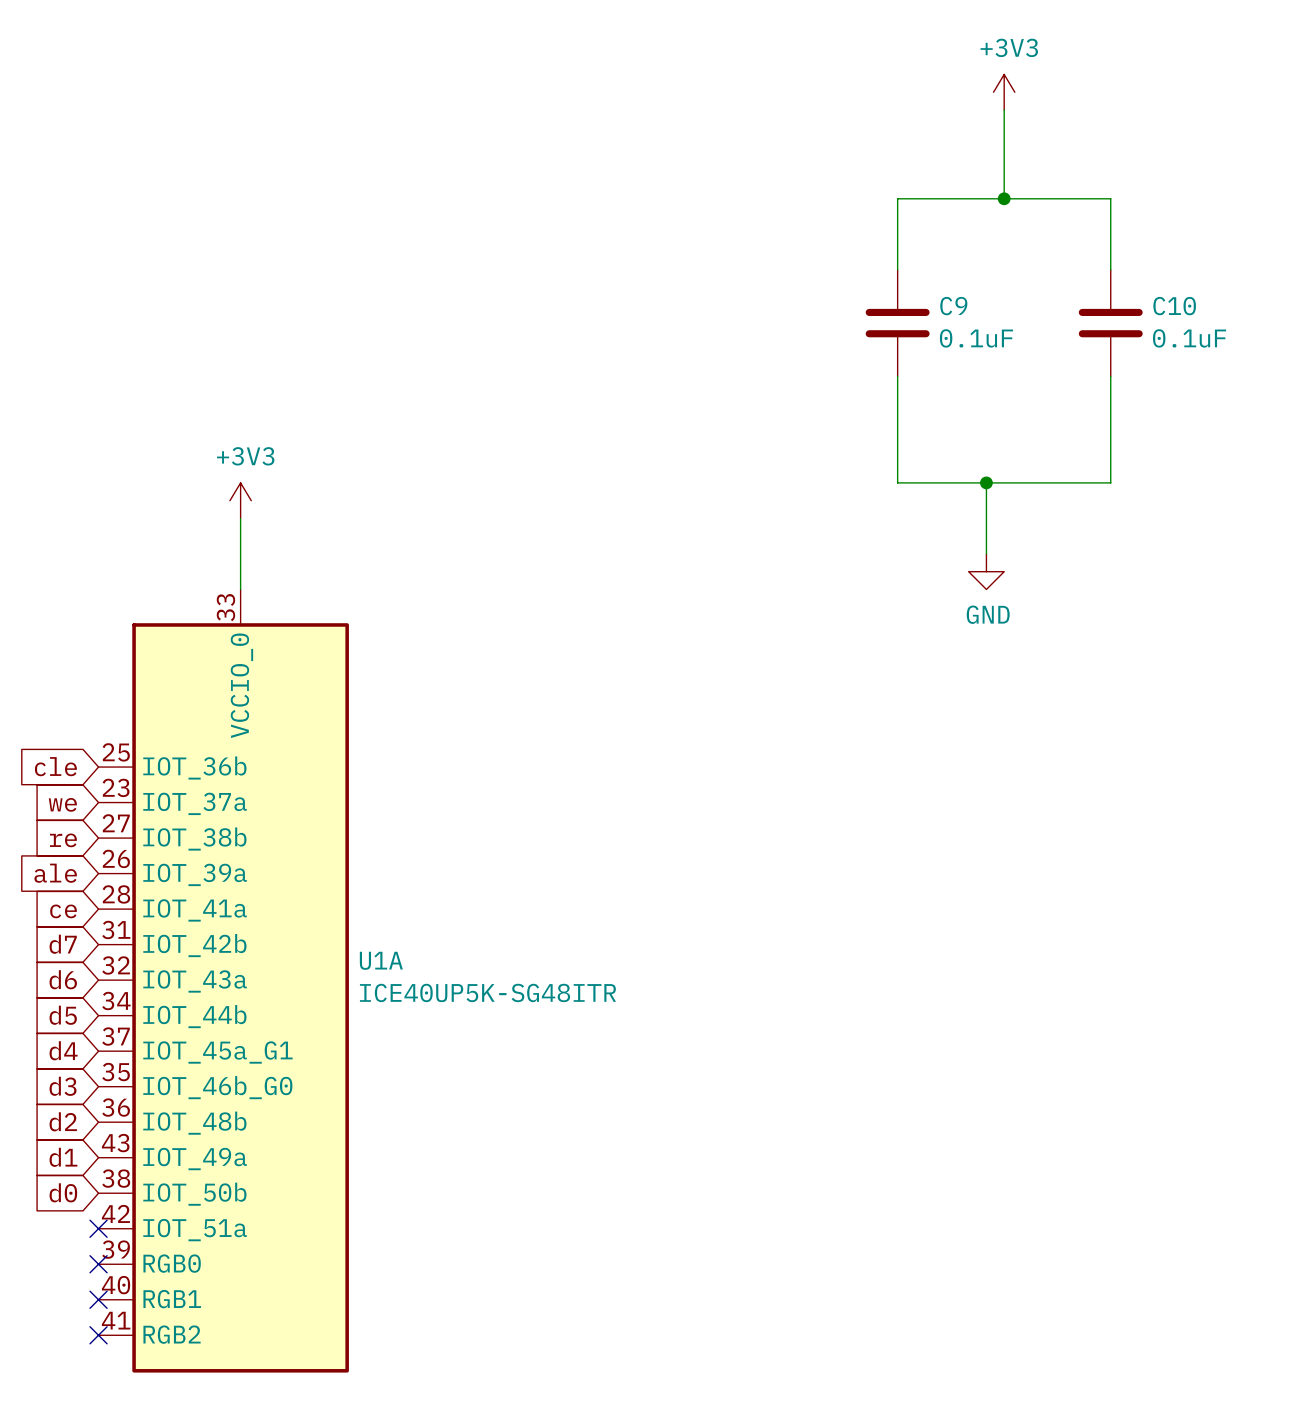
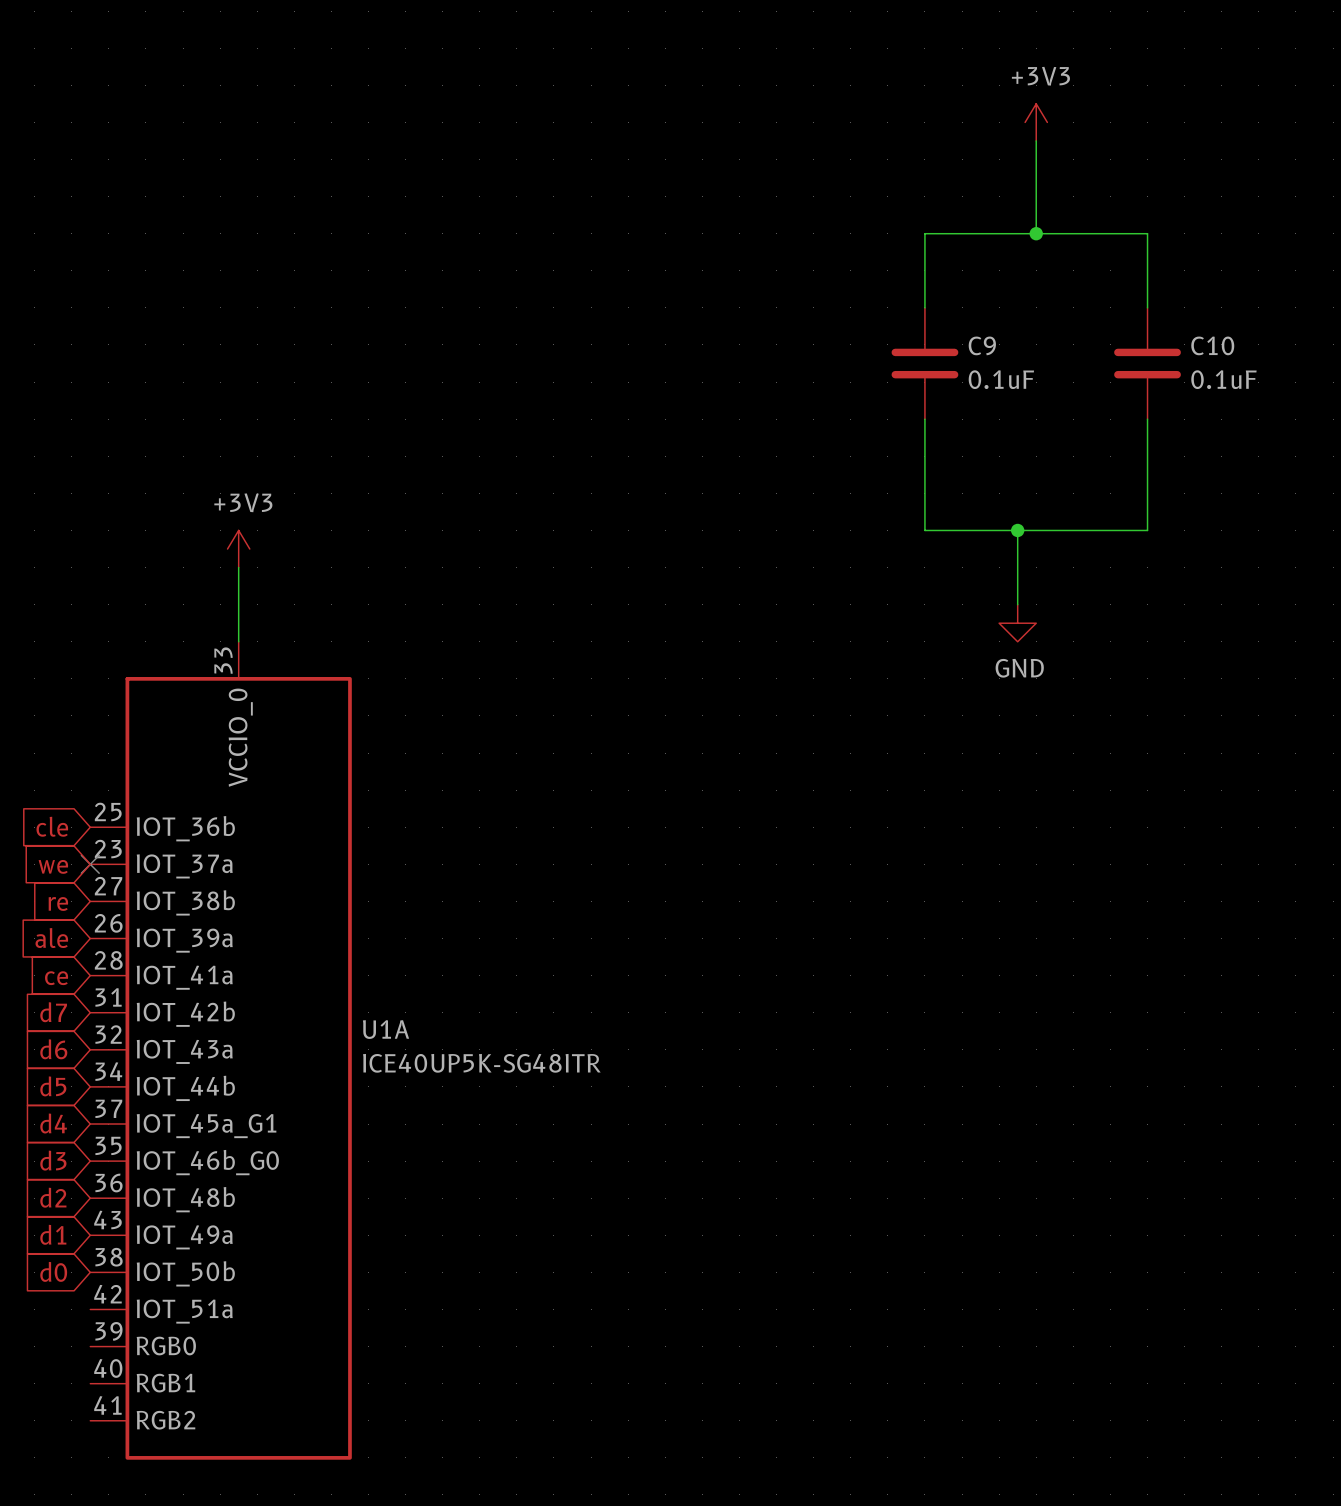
no-connect mark: none -> (90, 864)
no-connect mark: (98, 1228) -> none
no-connect mark: (98, 1264) -> none
no-connect mark: (98, 1299) -> none
no-connect mark: (98, 1335) -> none

